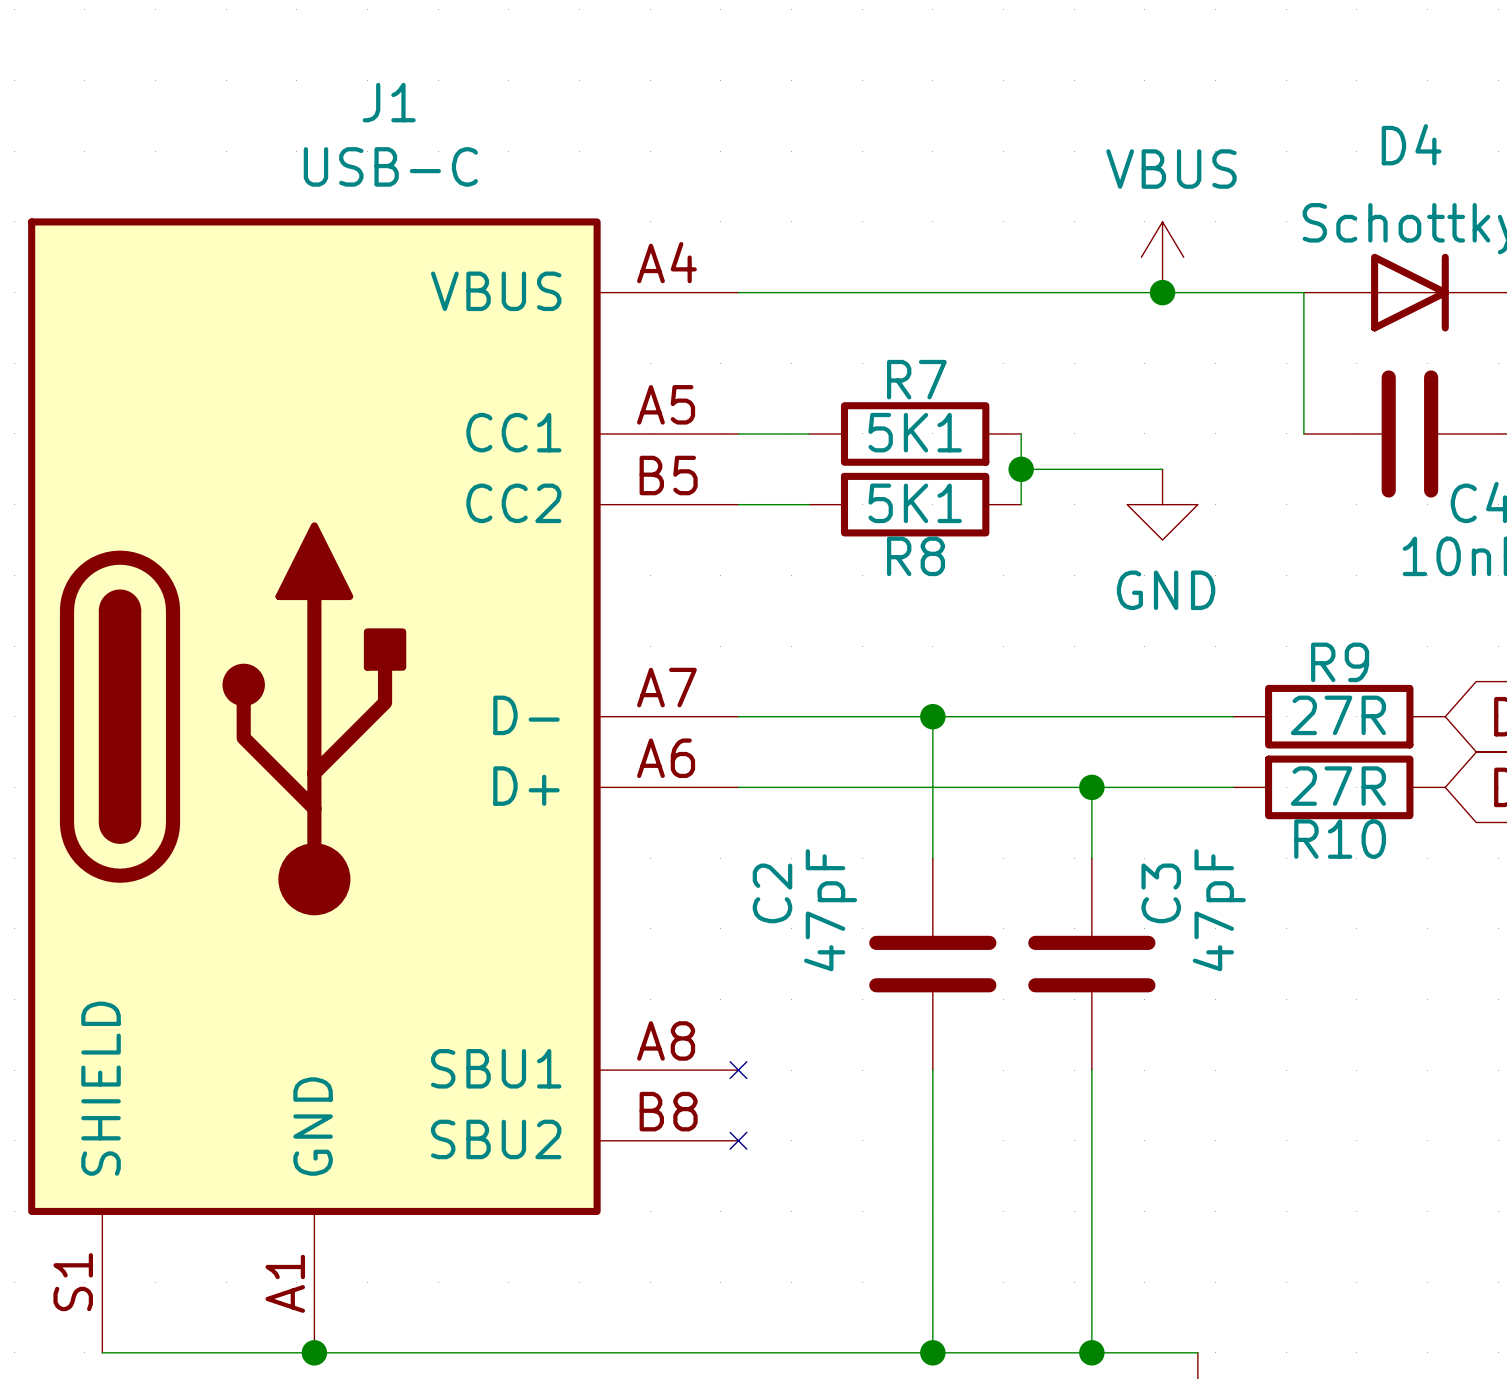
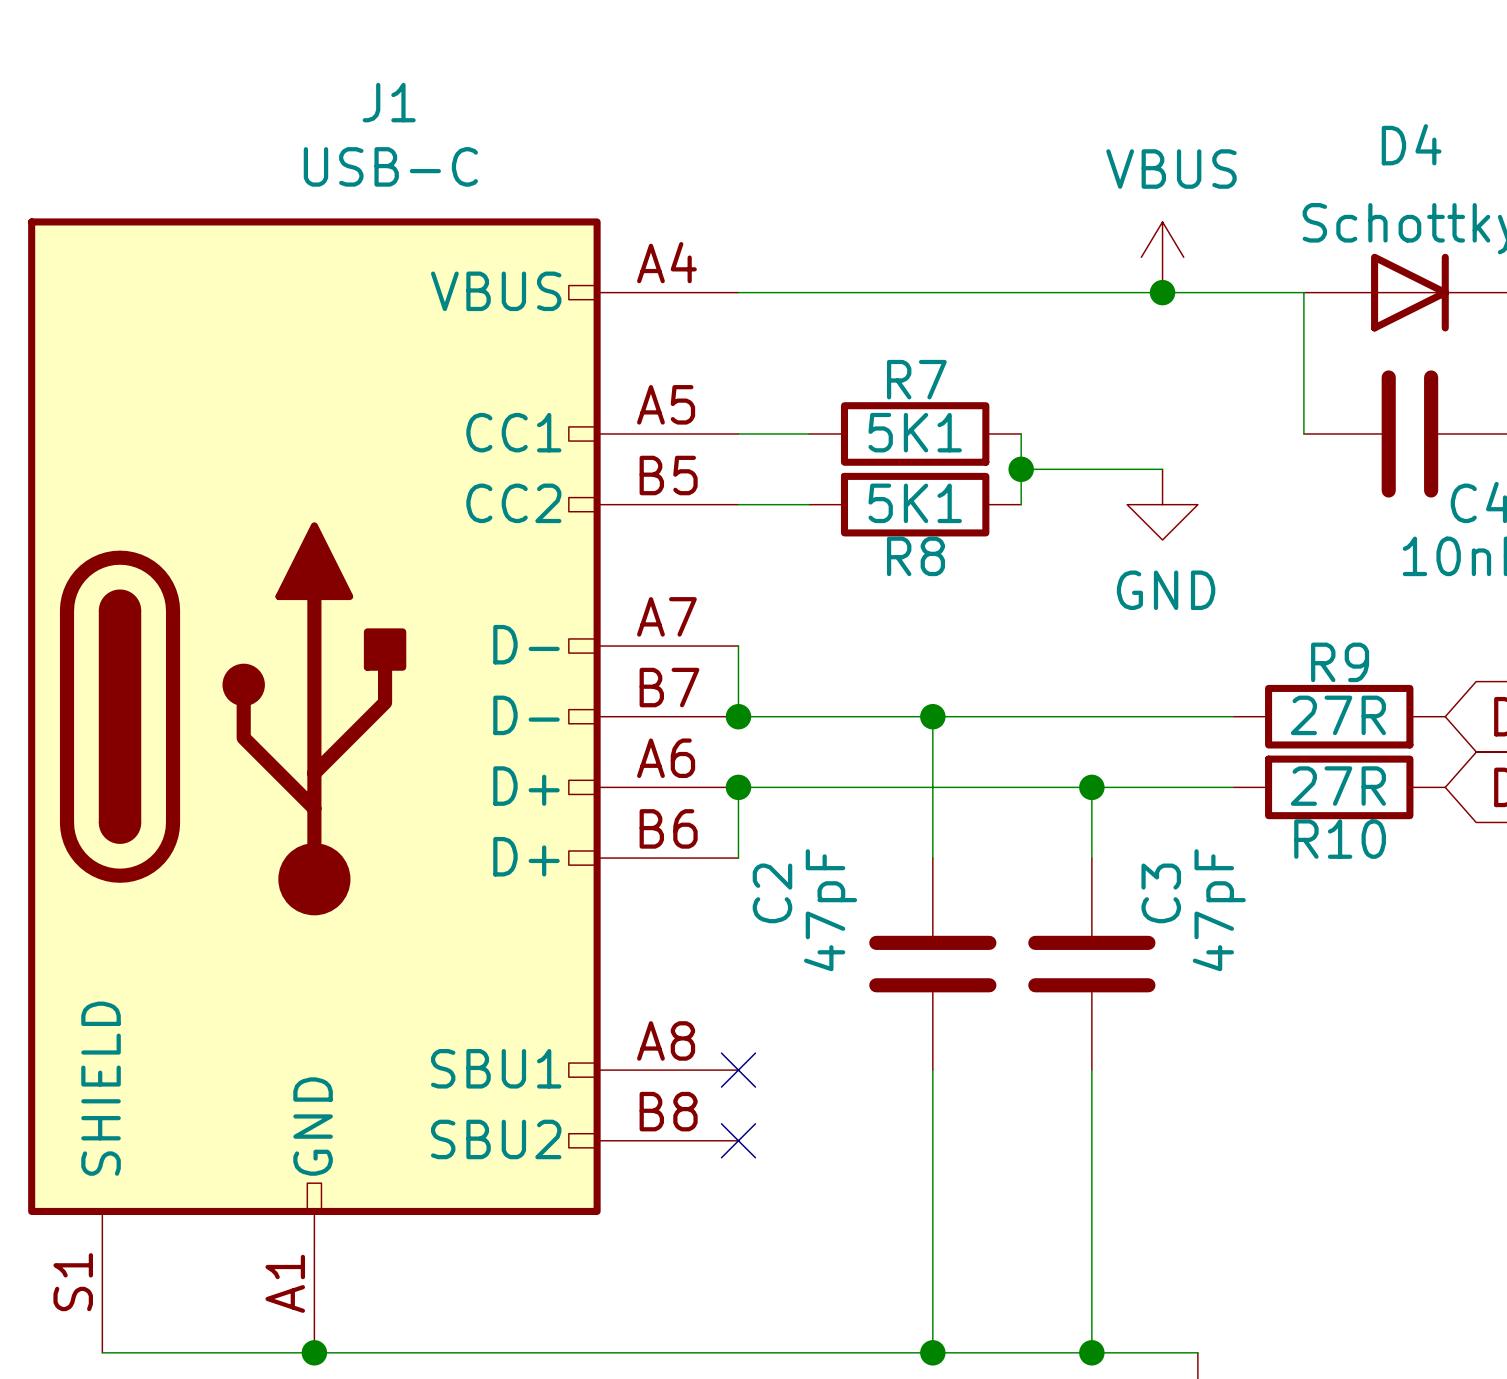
J1 symbol: [28, 218, 747, 1353] -> [28, 218, 739, 1353]
wire: none -> (738, 646) (738, 716)
junction: none -> (738, 716)
wire: none -> (738, 787) (738, 858)
junction: none -> (738, 787)
no-connect mark: none -> (738, 1070)
no-connect mark: none -> (738, 1140)

